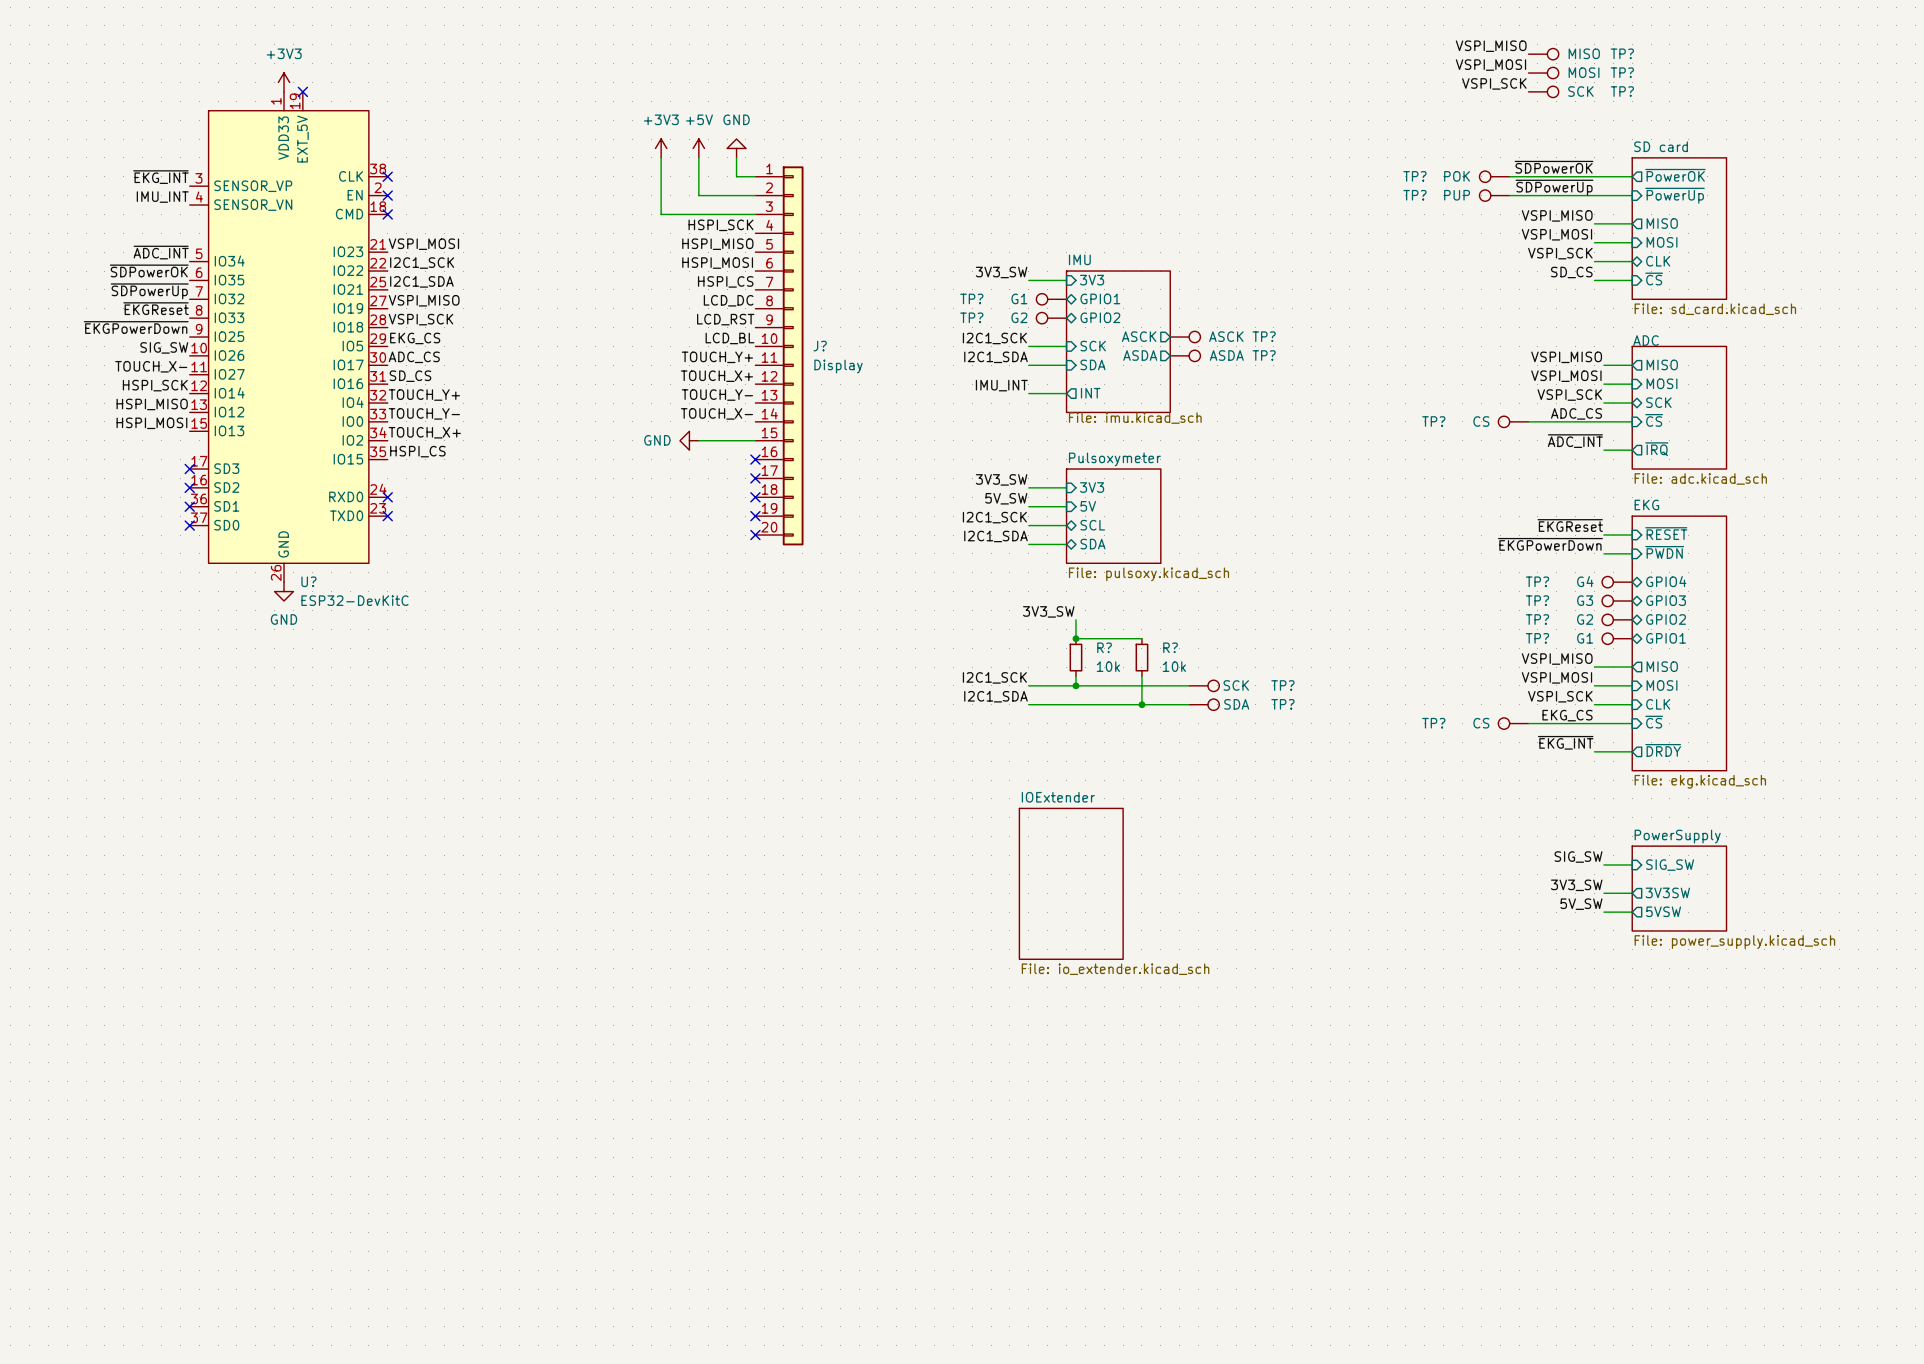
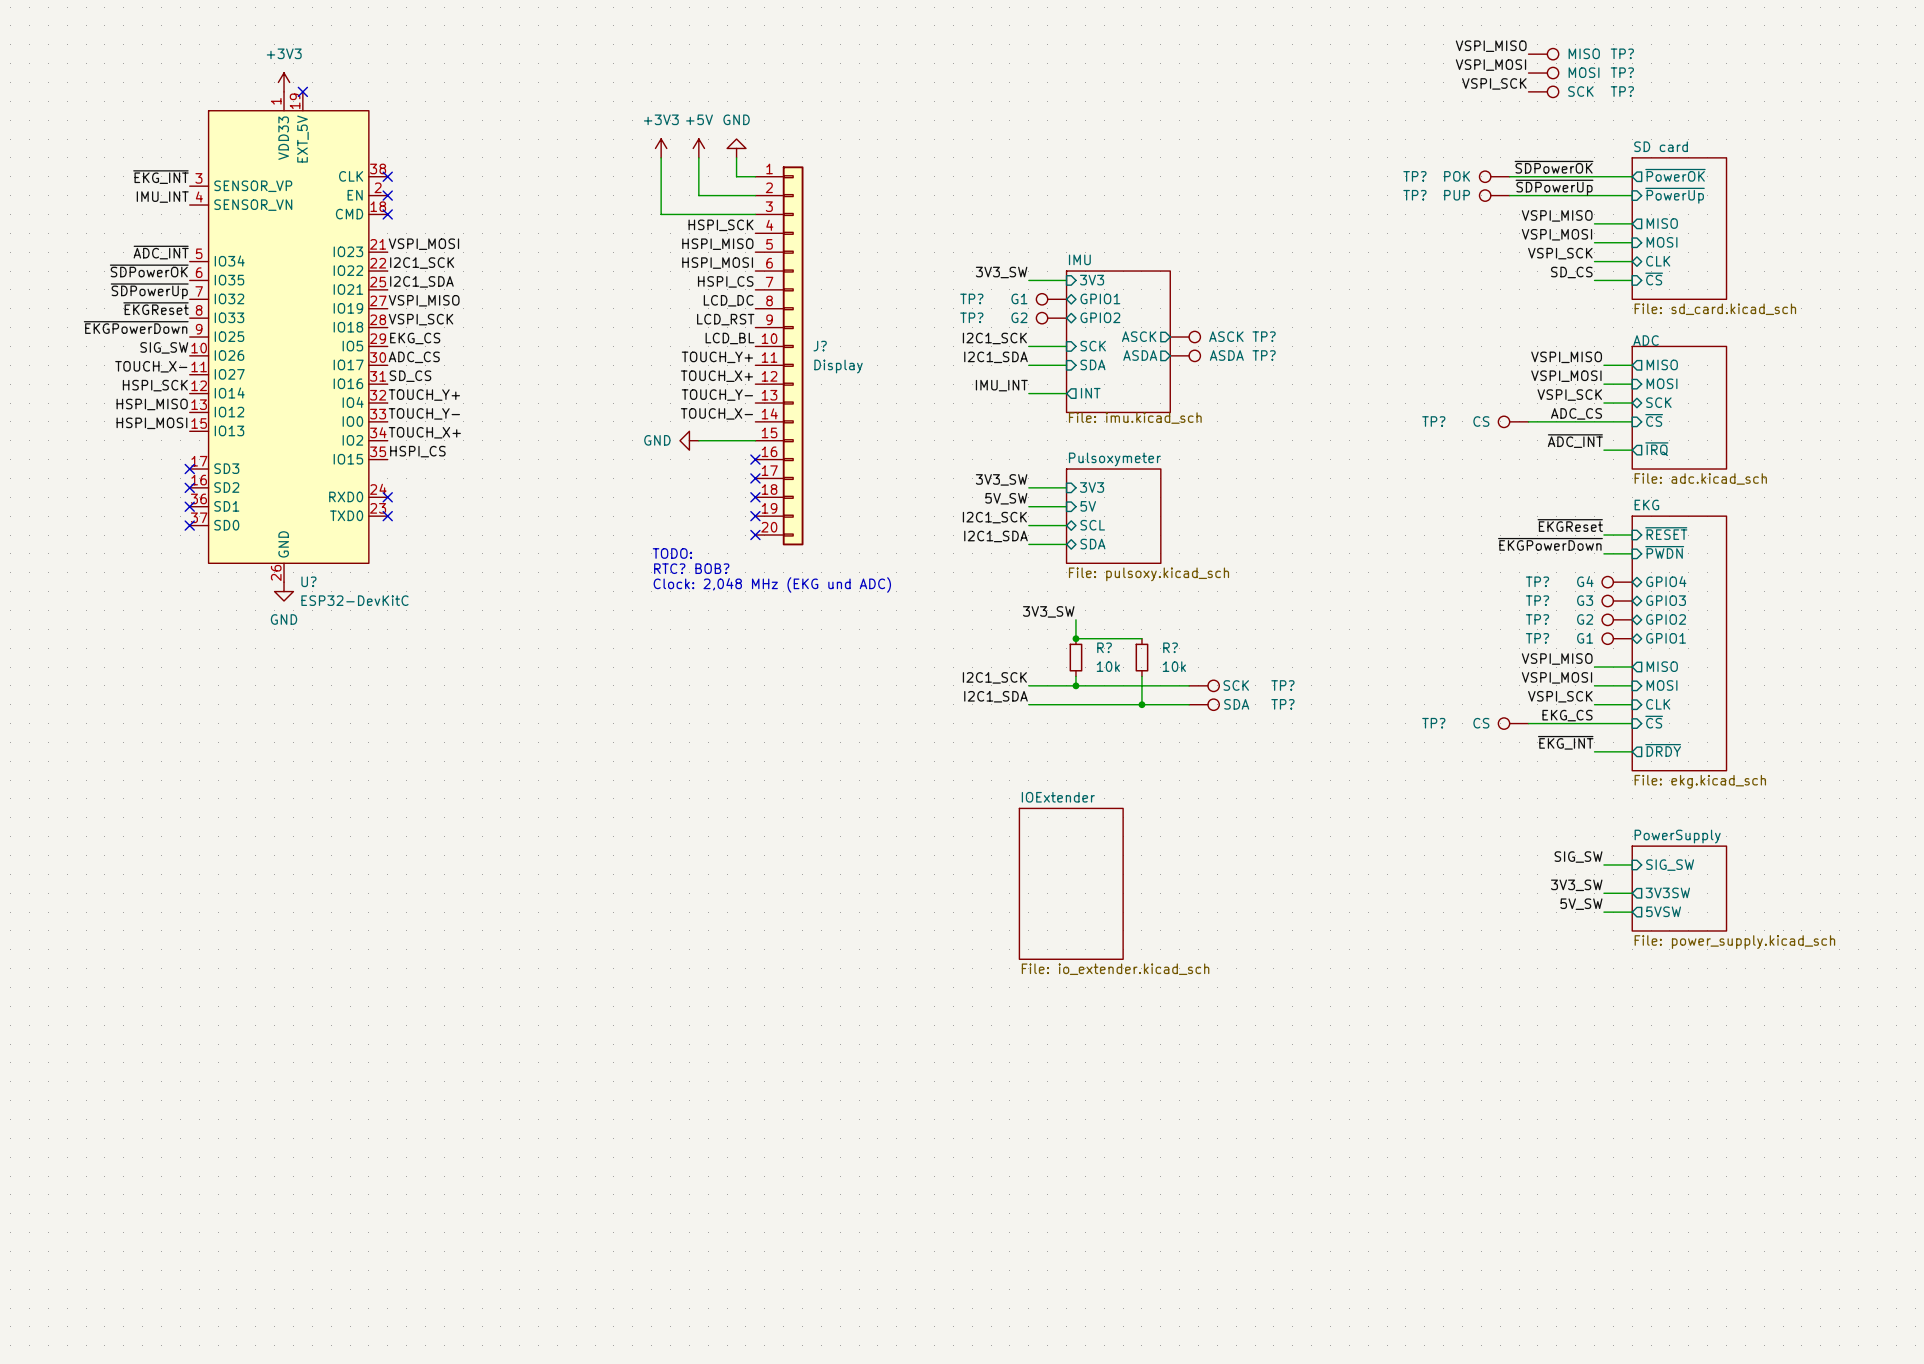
text: none -> TODO: (672, 553)
text: none -> RTC? BOB? (691, 568)
text: none -> Clock: 2,048 MHz (EKG und ADC) (772, 584)

